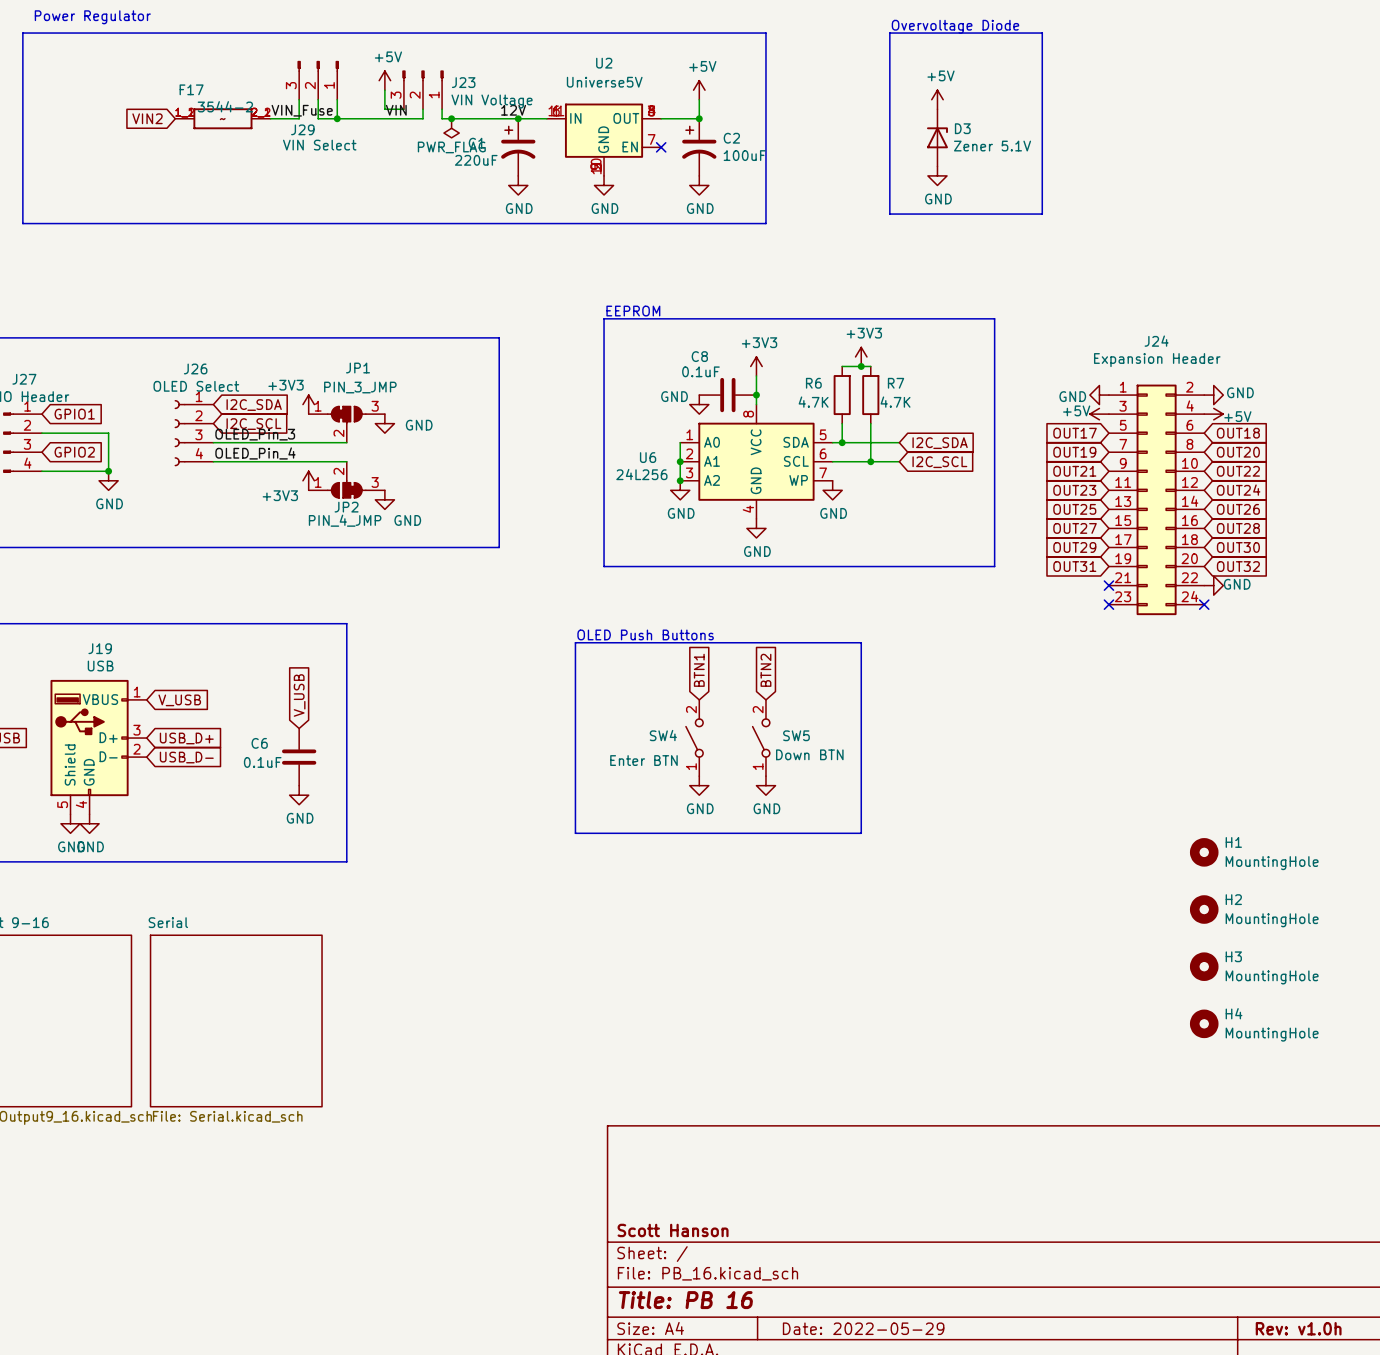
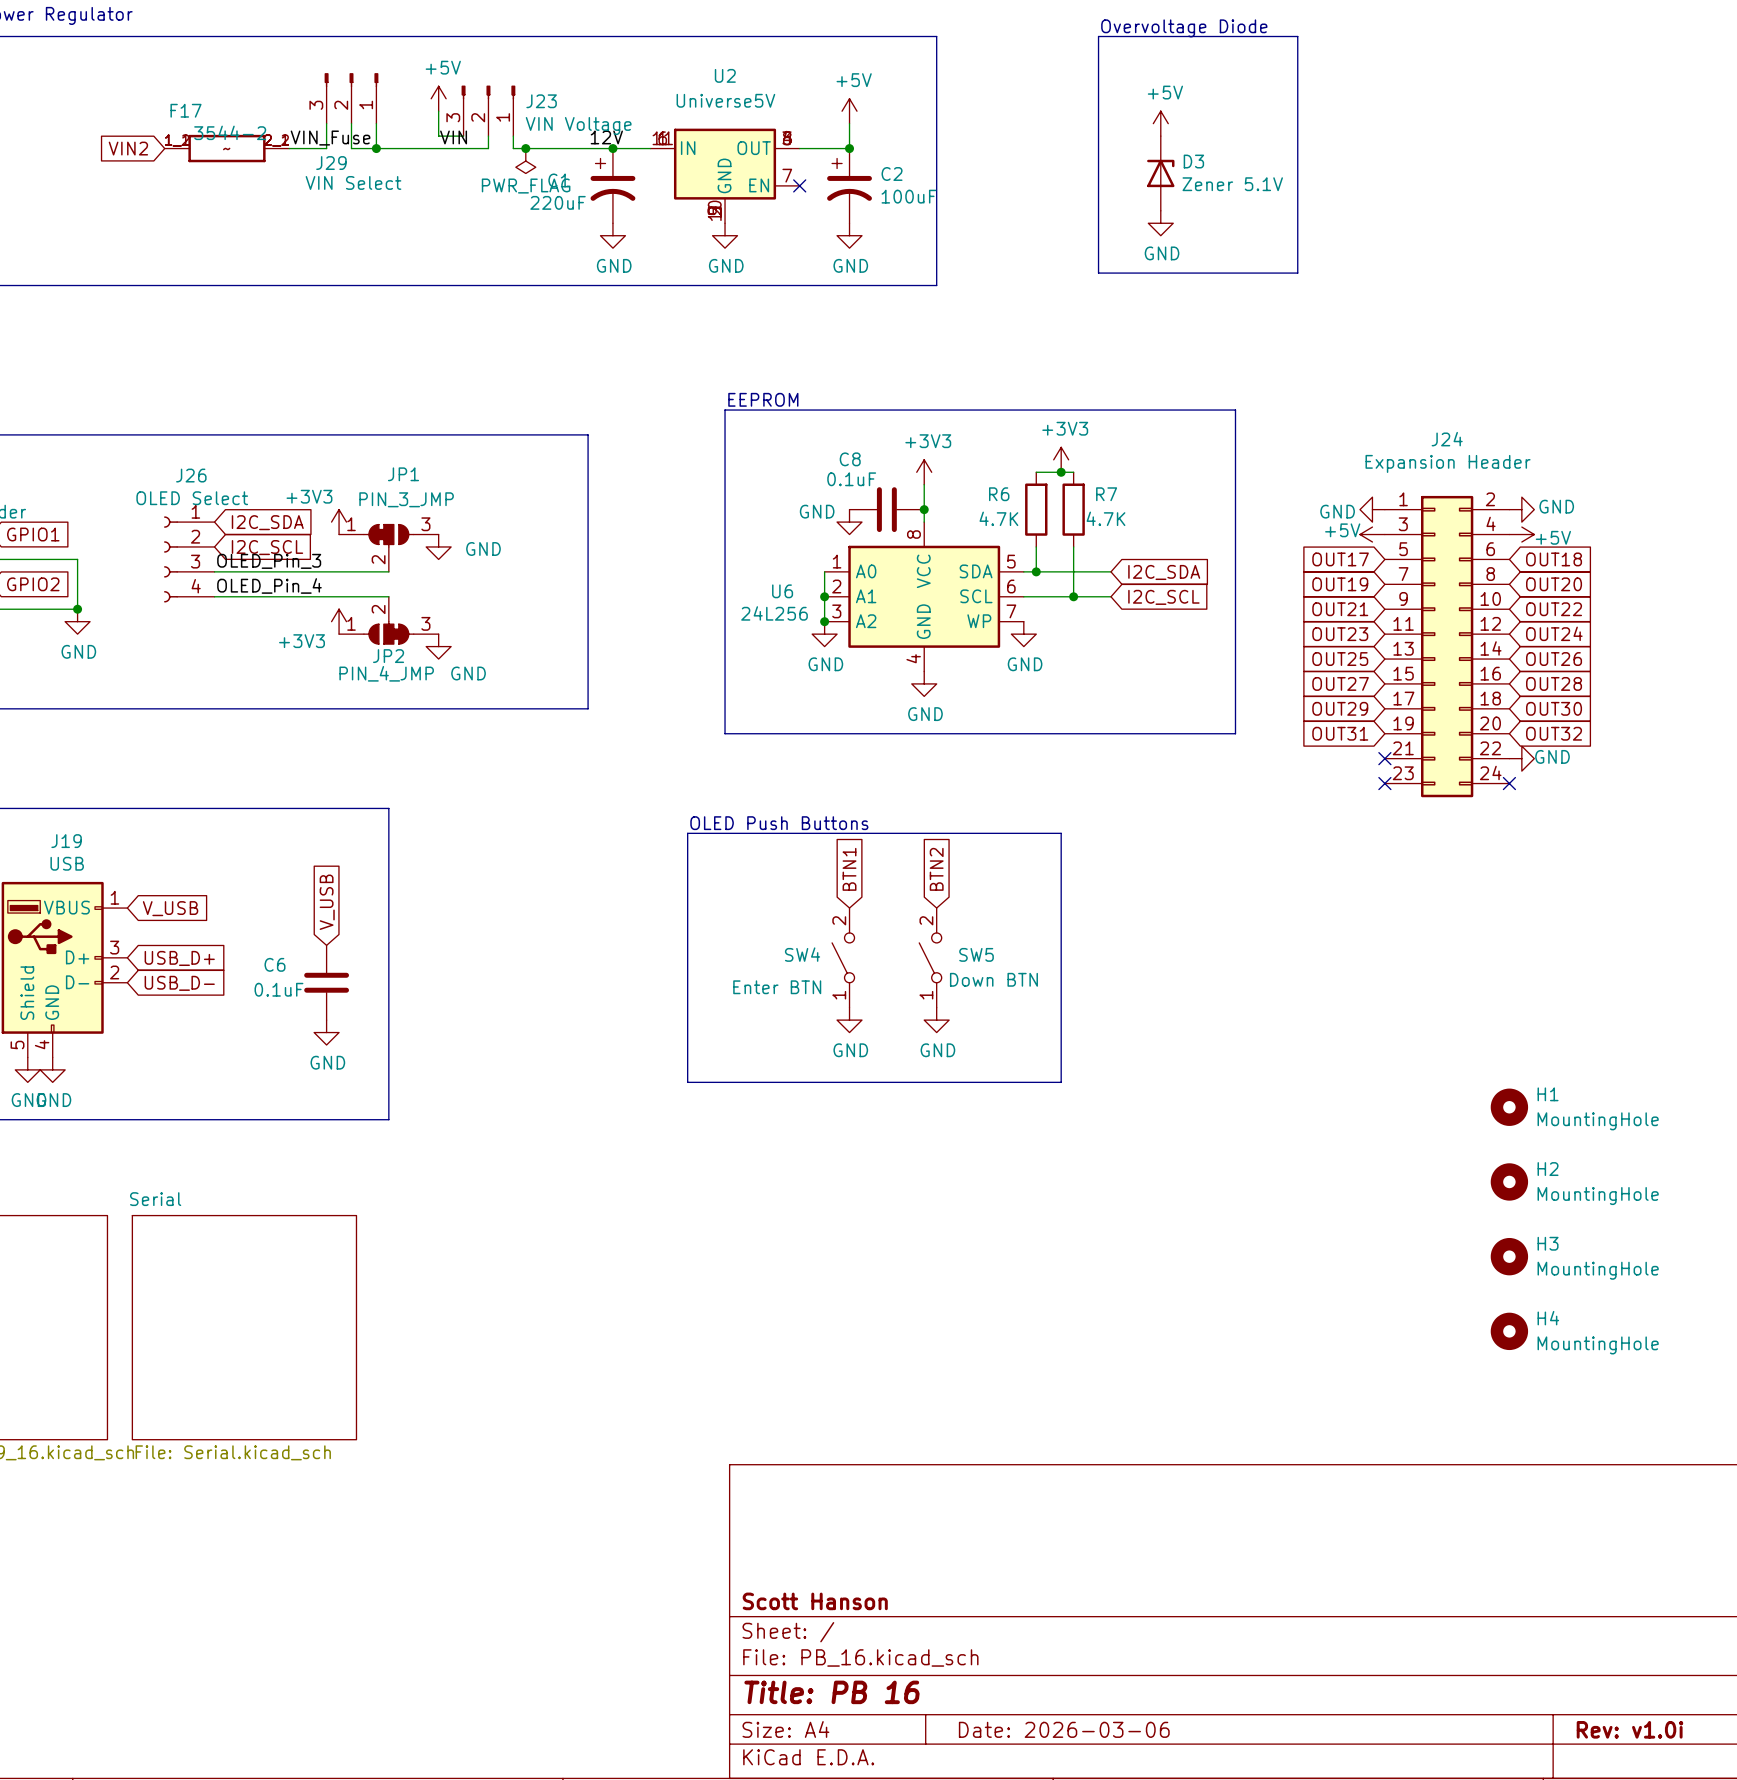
title block: Date: 2022-05-29 (863, 1328) -> Date: 2026-03-06 (1064, 1729)
title block: Rev: v1.0h (1298, 1328) -> Rev: v1.0i (1629, 1729)

